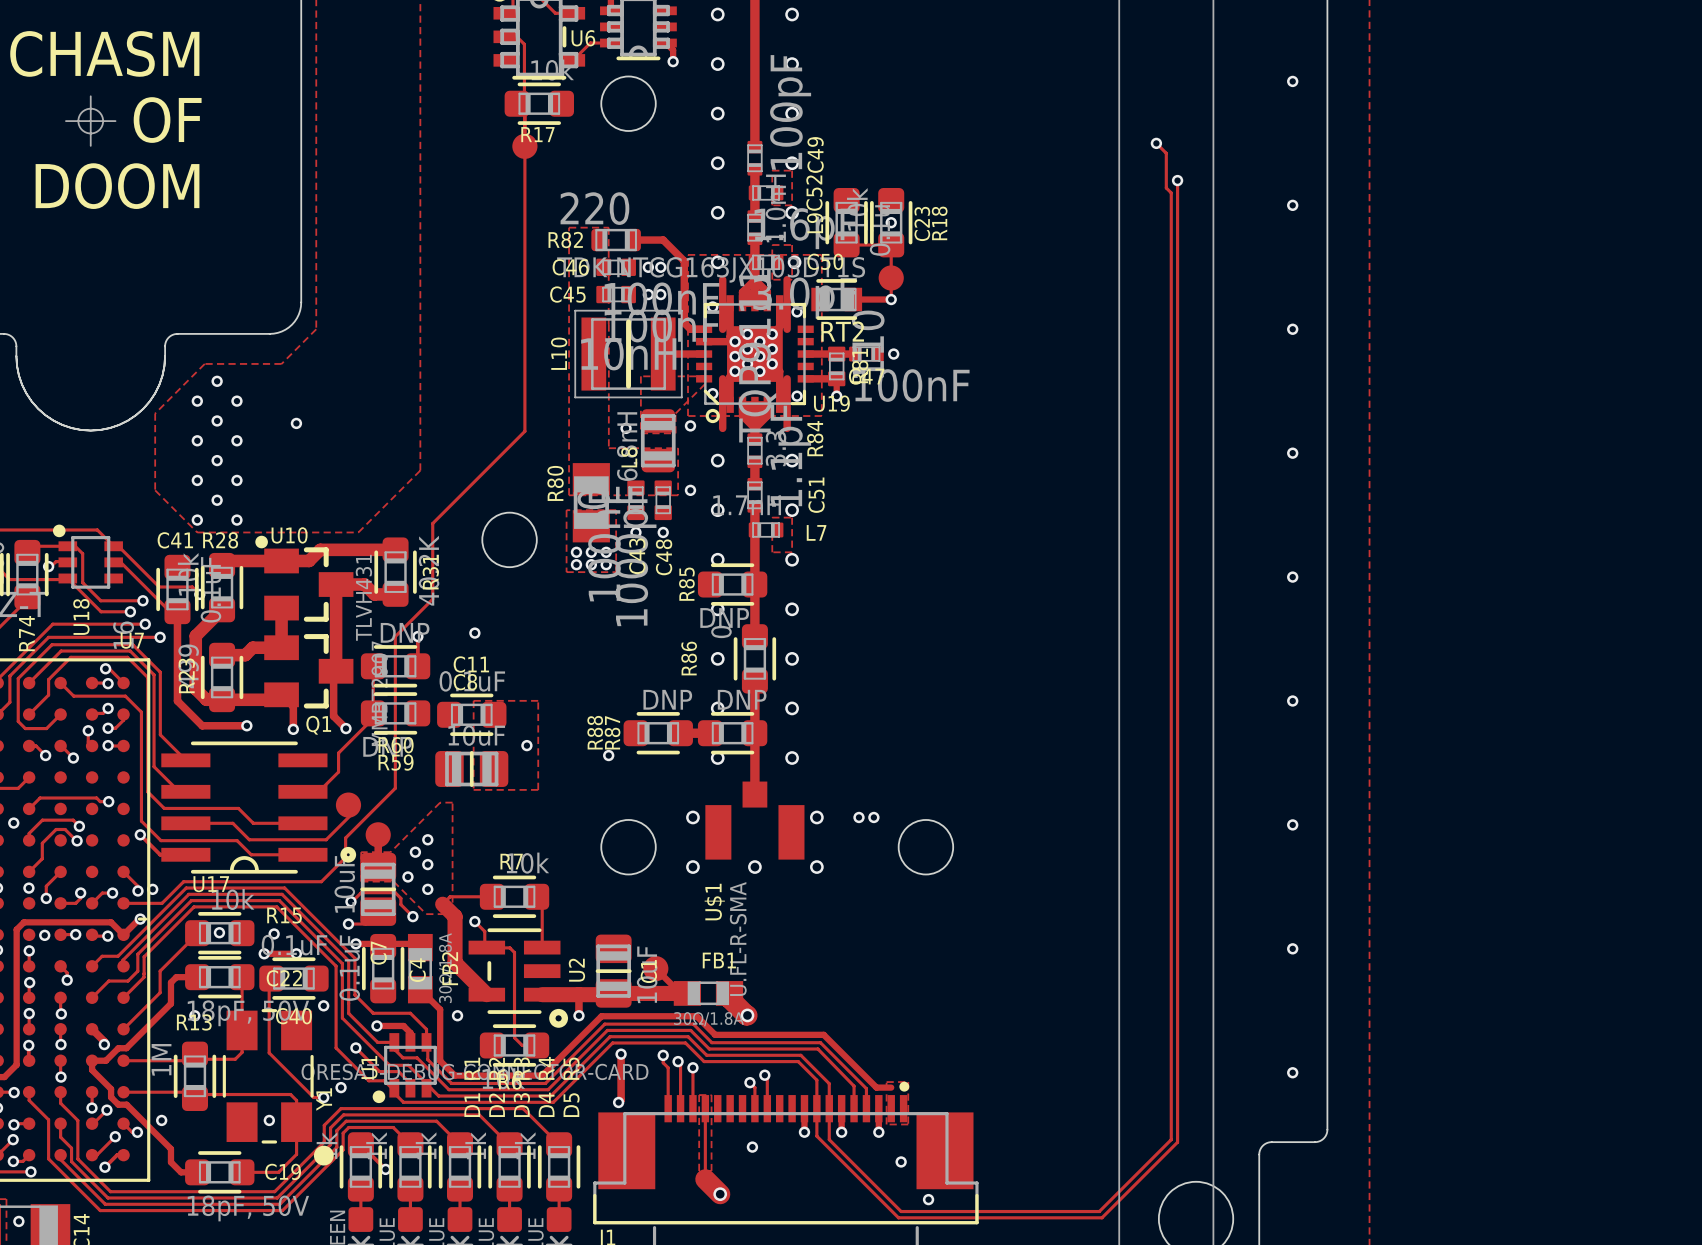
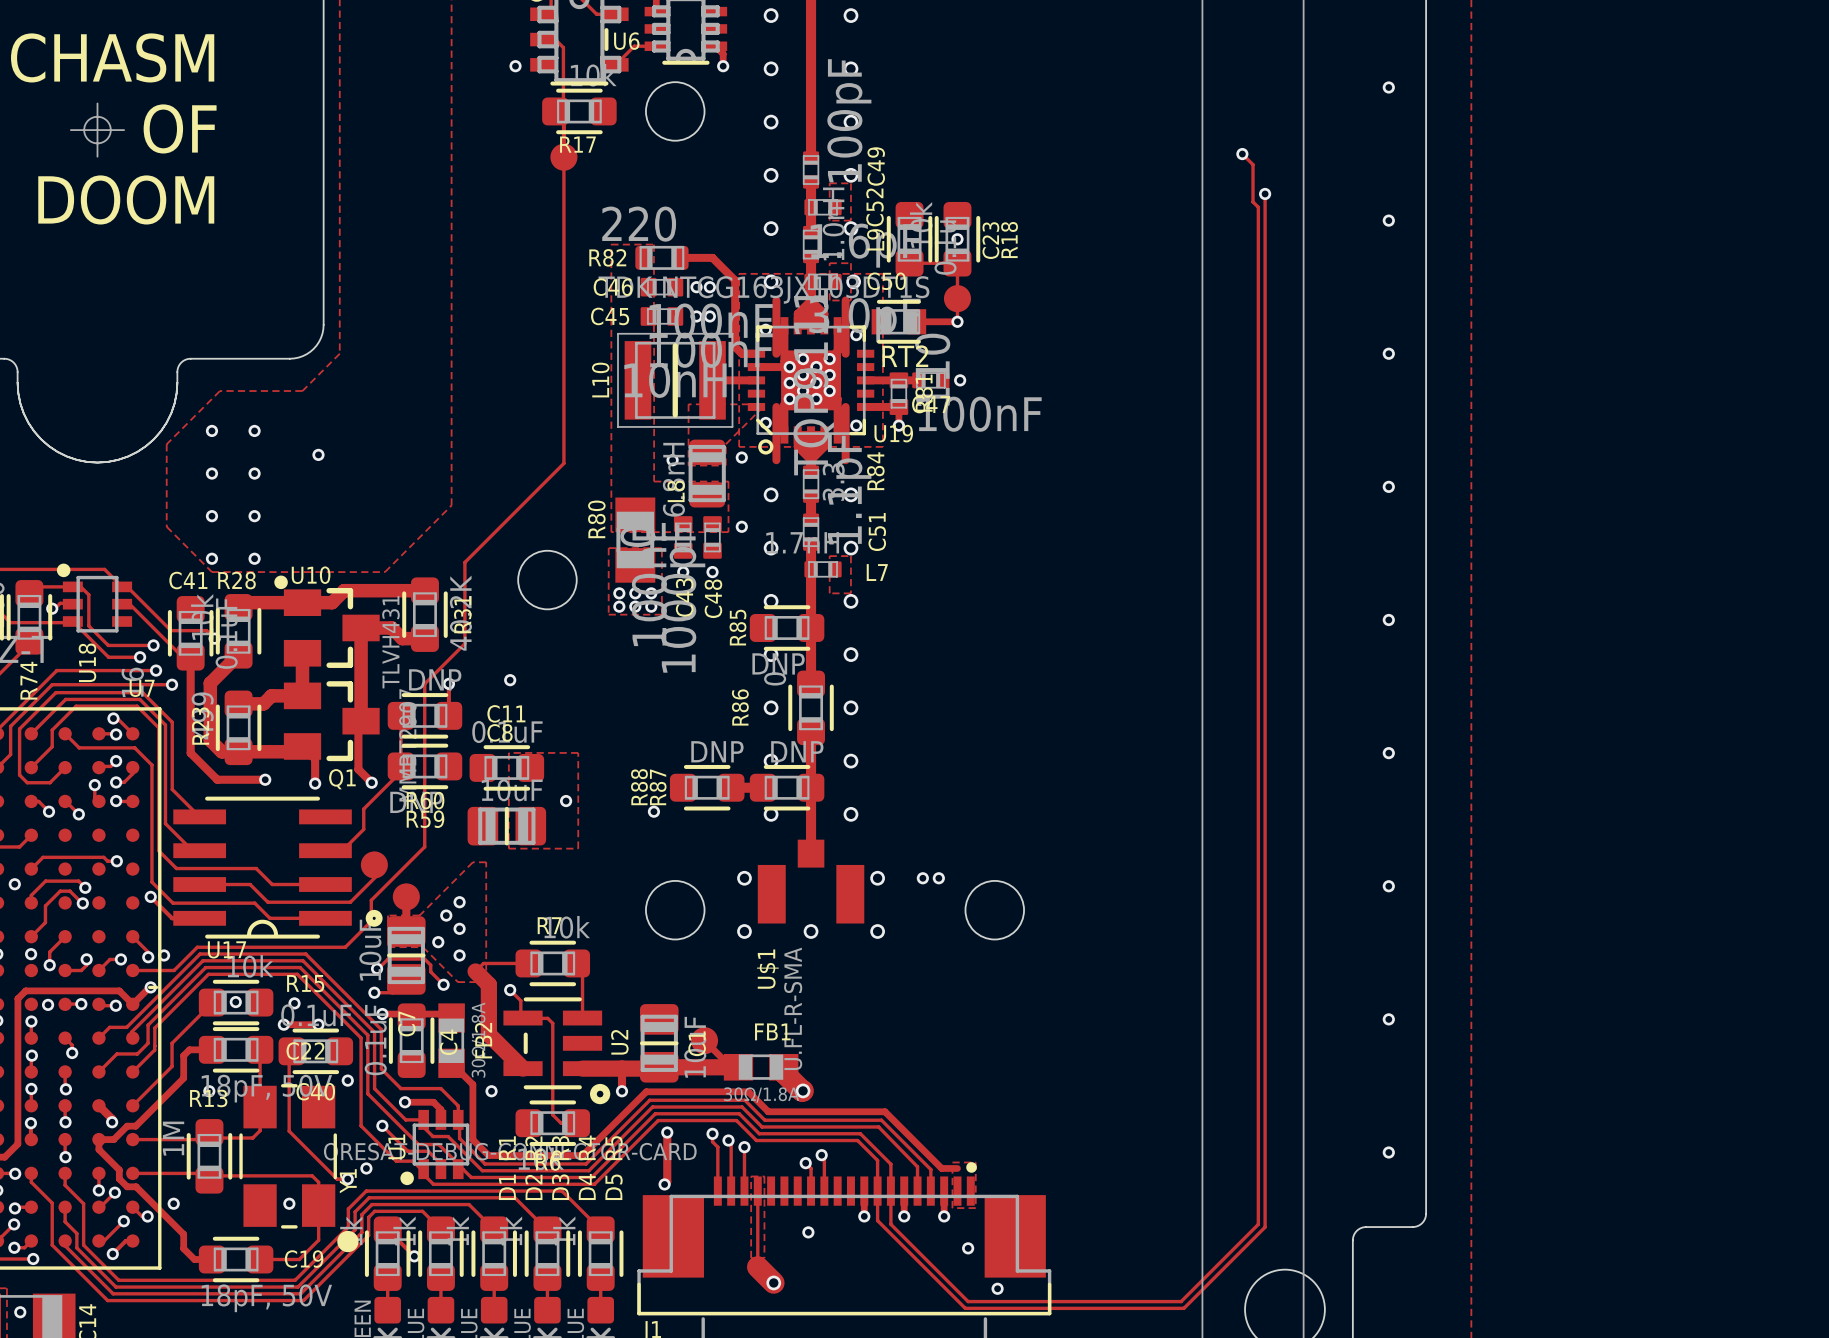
via: none -> (515, 66)
via: (217, 381) -> none
via: (217, 420) -> none
via: (217, 460) -> none
via: (217, 500) -> none

